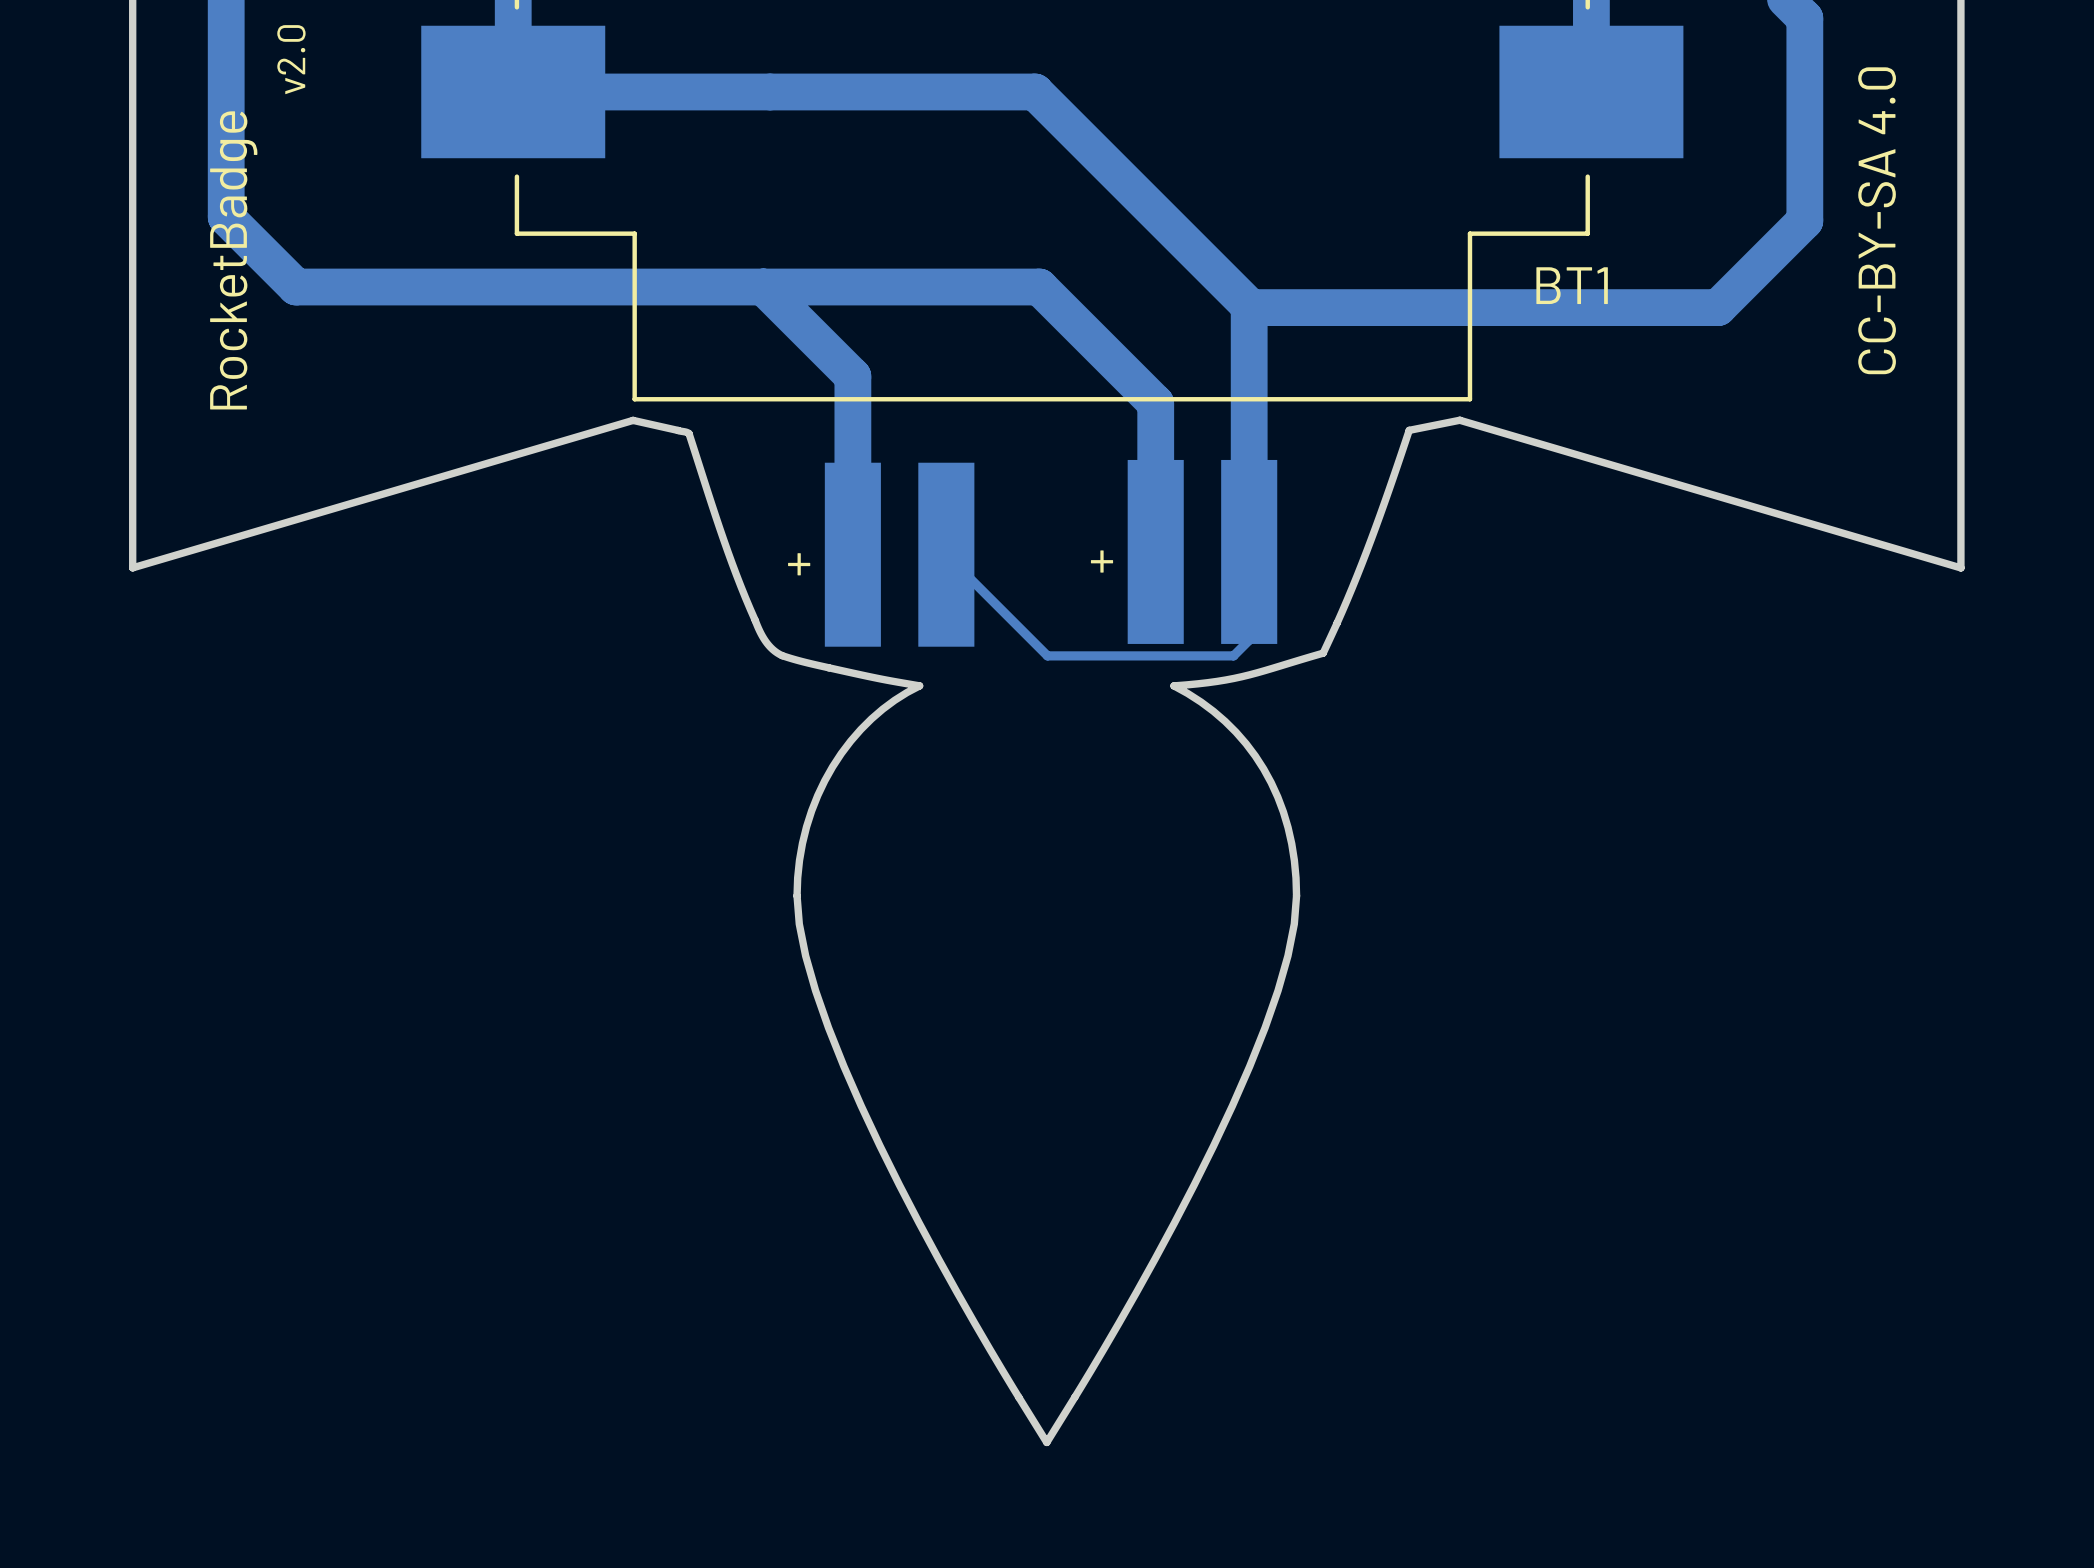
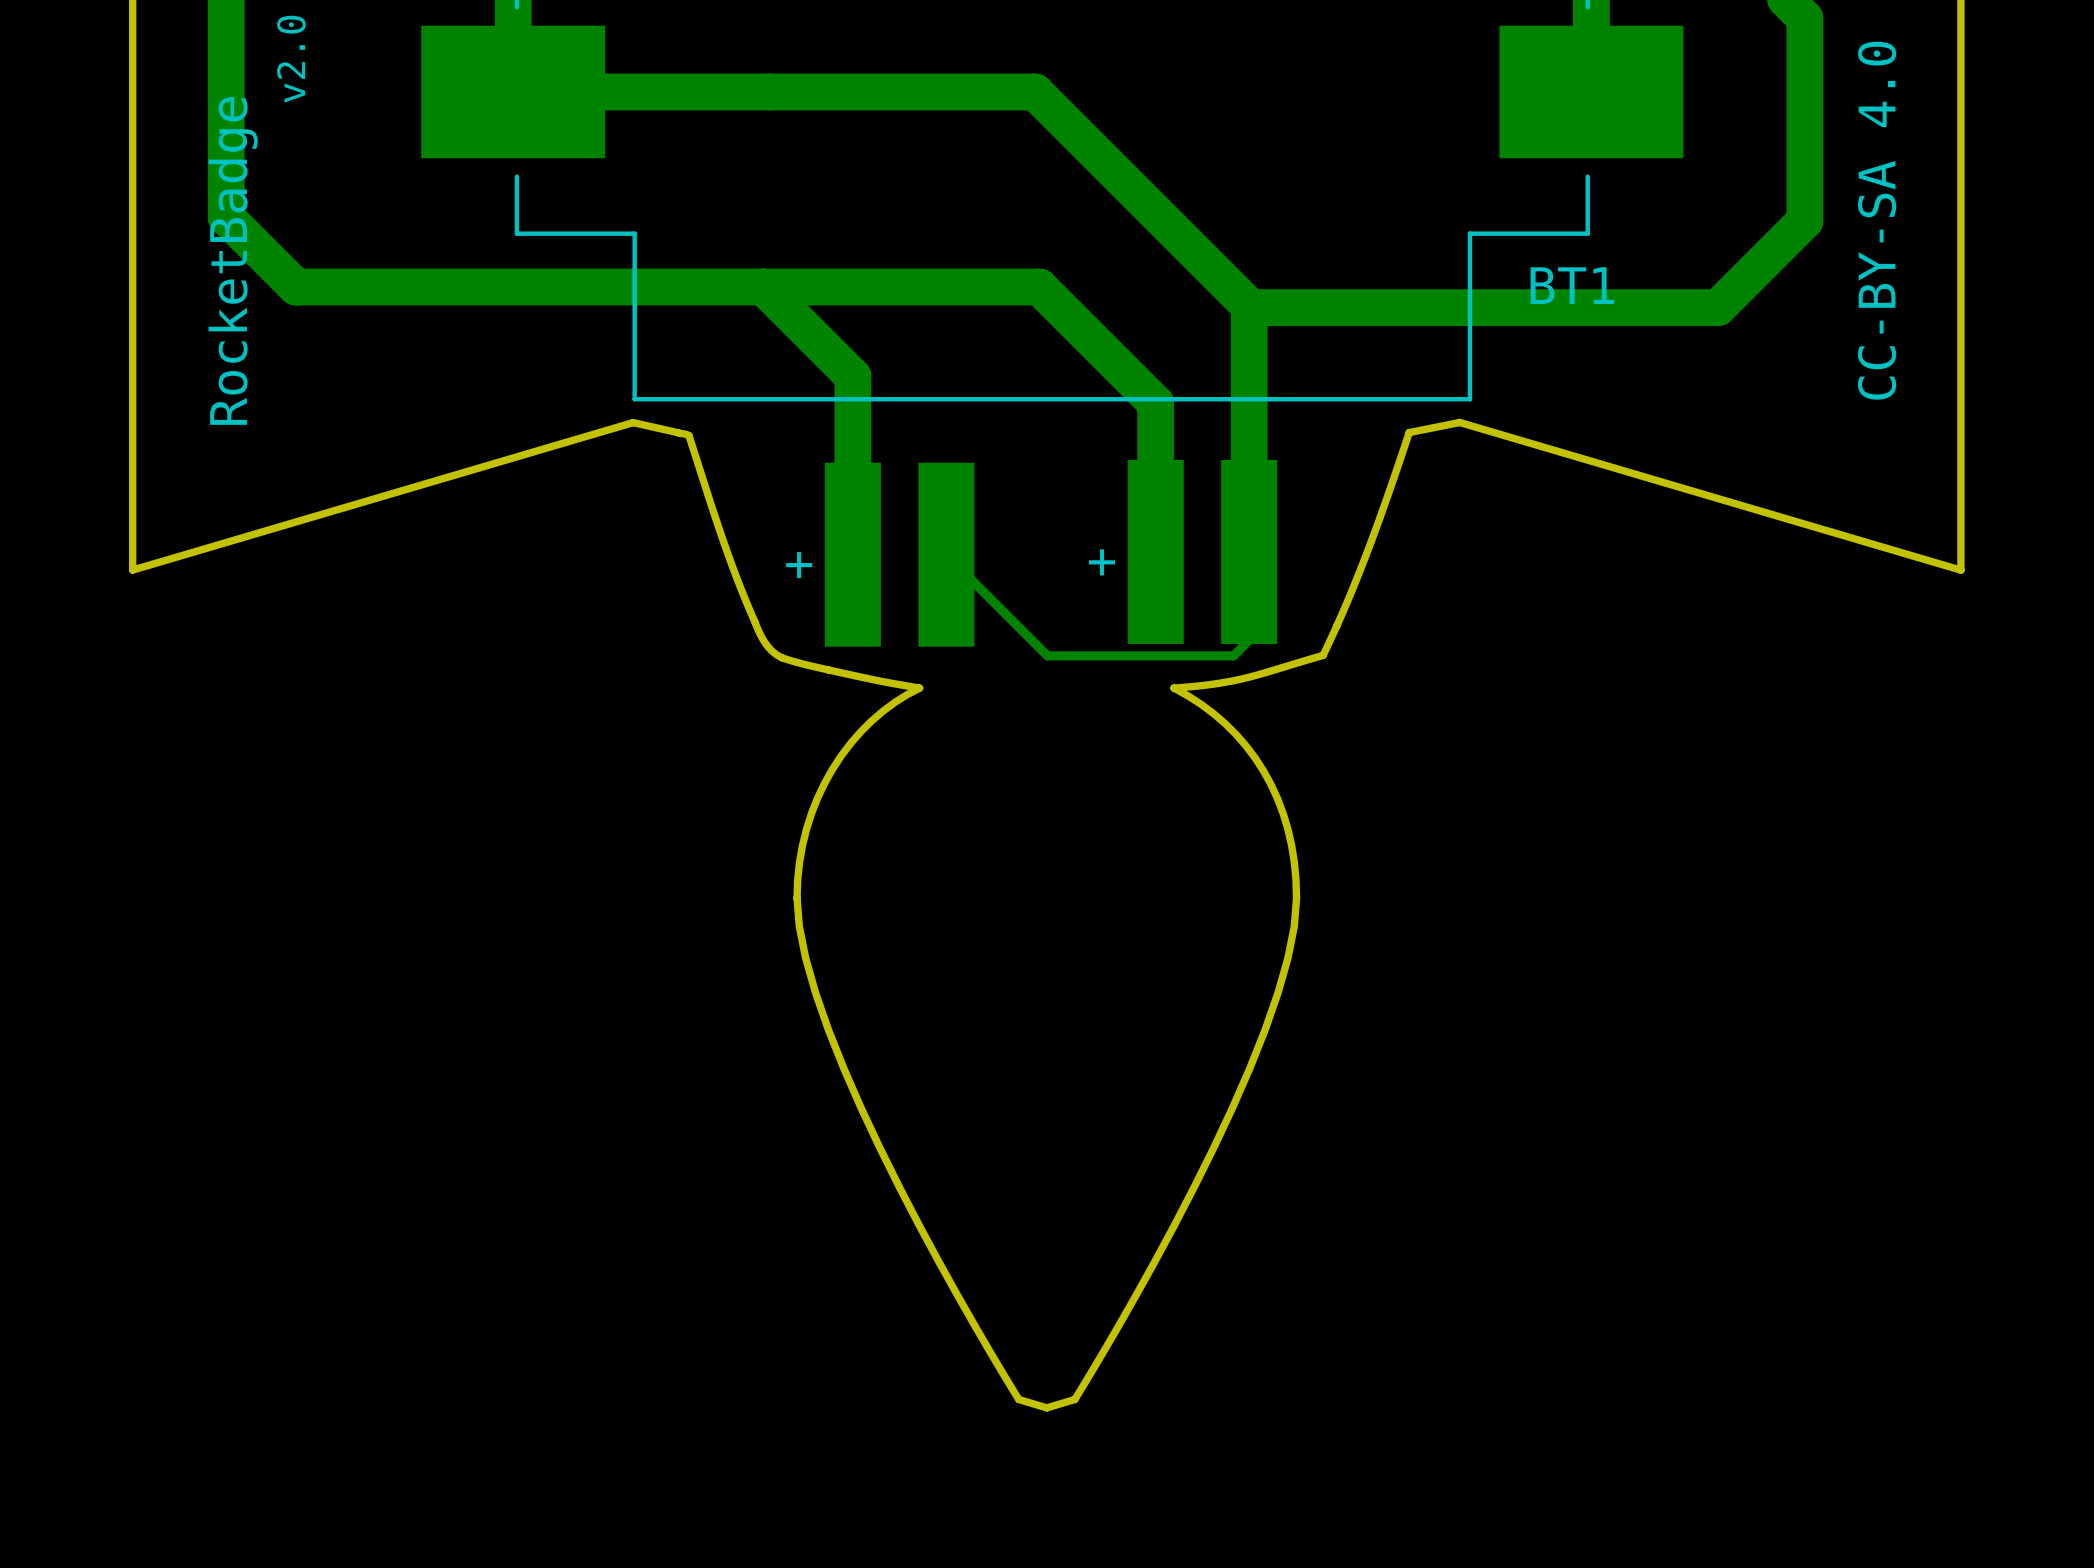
board edge: (1960, 567) (1459, 420) (1409, 430) (1366, 551) (1323, 653) (1241, 676) (1173, 685) (1201, 702) (1236, 732) (1255, 756) (1271, 782) (1283, 812) (1291, 843) (1296, 877) (1294, 924) (1287, 955) (1265, 1027) (1213, 1145) (1136, 1292) (1046, 1442) (957, 1292) (879, 1145) (828, 1027) (805, 955) (799, 924) (797, 877) (802, 843) (811, 810) (824, 780) (841, 753) (860, 729) (894, 700) (919, 685) (799, 660) (779, 654) (768, 645) (758, 628) (736, 574) (689, 433) (633, 420) (132, 567) -> (1960, 567) (1960, 570) (1459, 422) (1409, 432) (1366, 554) (1323, 655) (1241, 678) (1173, 688) (1201, 704) (1236, 734) (1255, 758) (1271, 784) (1283, 814) (1291, 846) (1296, 880) (1294, 926) (1287, 958) (1265, 1029) (1232, 1108) (1194, 1187) (1136, 1294) (1074, 1399) (1046, 1407) (1018, 1399) (957, 1294) (899, 1187) (861, 1108) (828, 1029) (805, 958) (799, 926) (797, 880) (802, 845) (811, 813) (824, 783) (841, 755) (860, 731) (894, 702) (919, 688) (799, 663) (779, 656) (768, 647) (758, 630) (736, 577) (689, 435) (633, 422) (132, 570) (132, 567)

